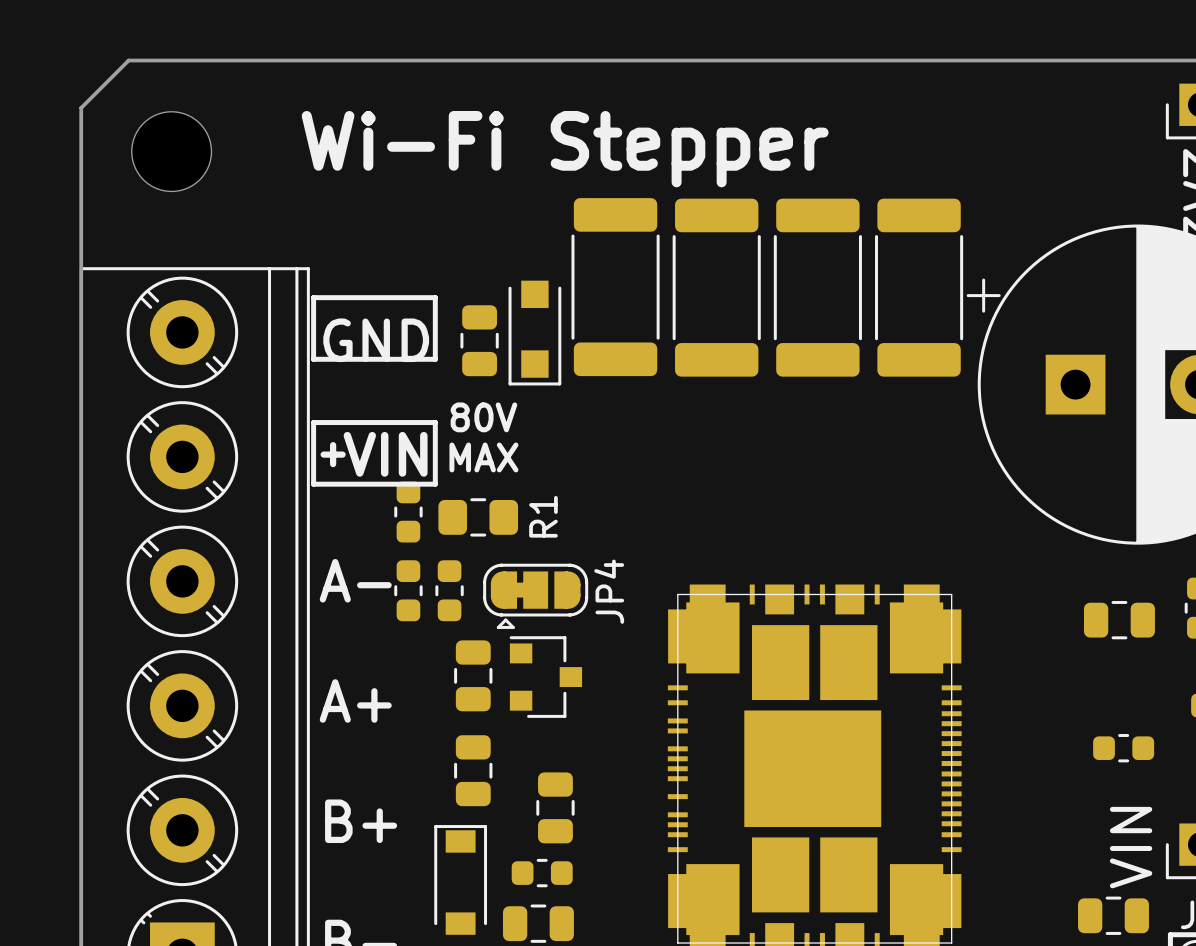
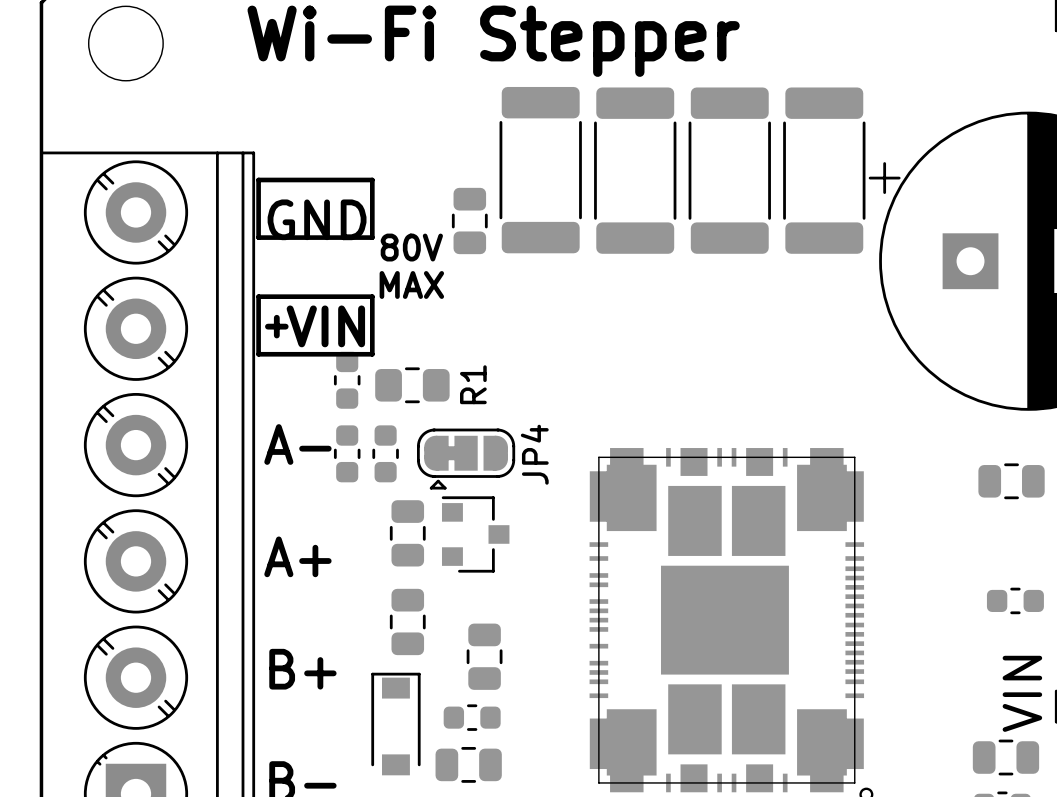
part footprint: [508, 280, 562, 386] -> [451, 187, 488, 255]
part: (479, 340) -> none
text position: 80V (483, 417) -> 80V (411, 247)
text position: MAX (483, 457) -> MAX (411, 284)

